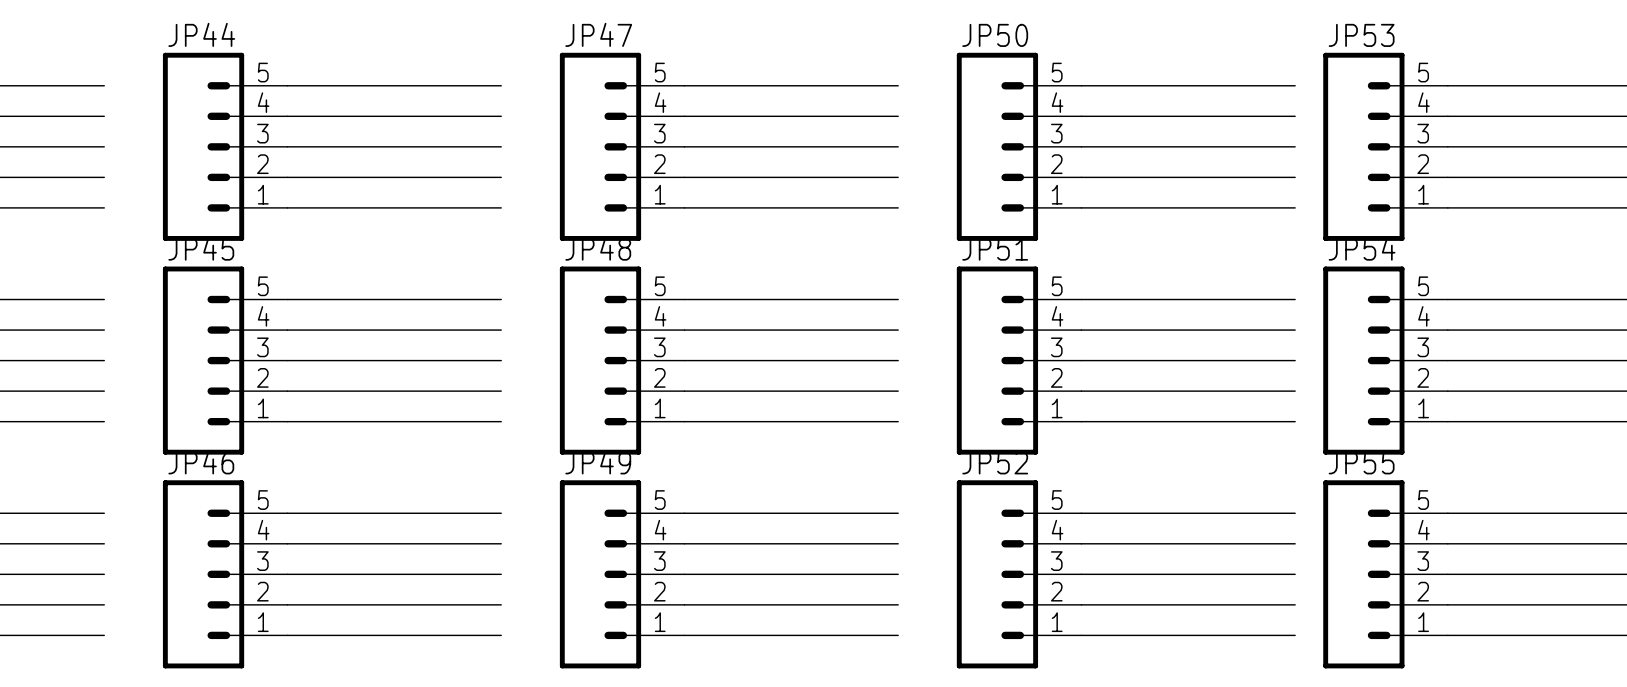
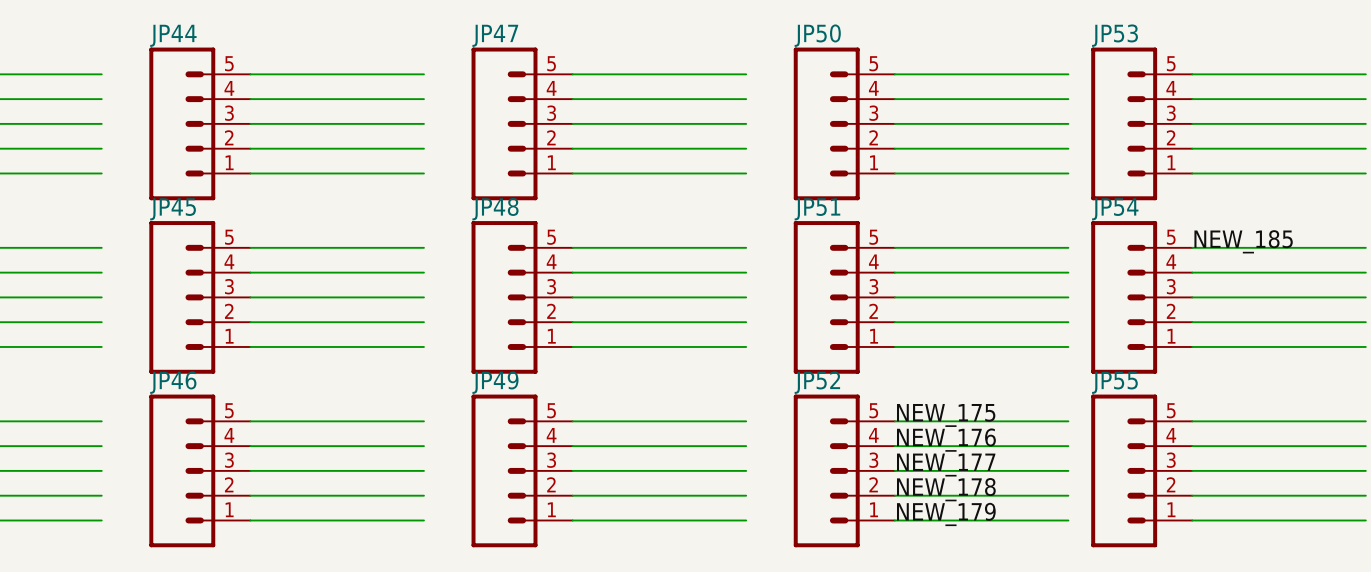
label: none -> NEW_185 (1243, 241)
label: none -> NEW_175 (946, 415)
label: none -> NEW_176 (946, 440)
label: none -> NEW_177 (946, 465)
label: none -> NEW_178 (946, 489)
label: none -> NEW_179 (946, 514)

